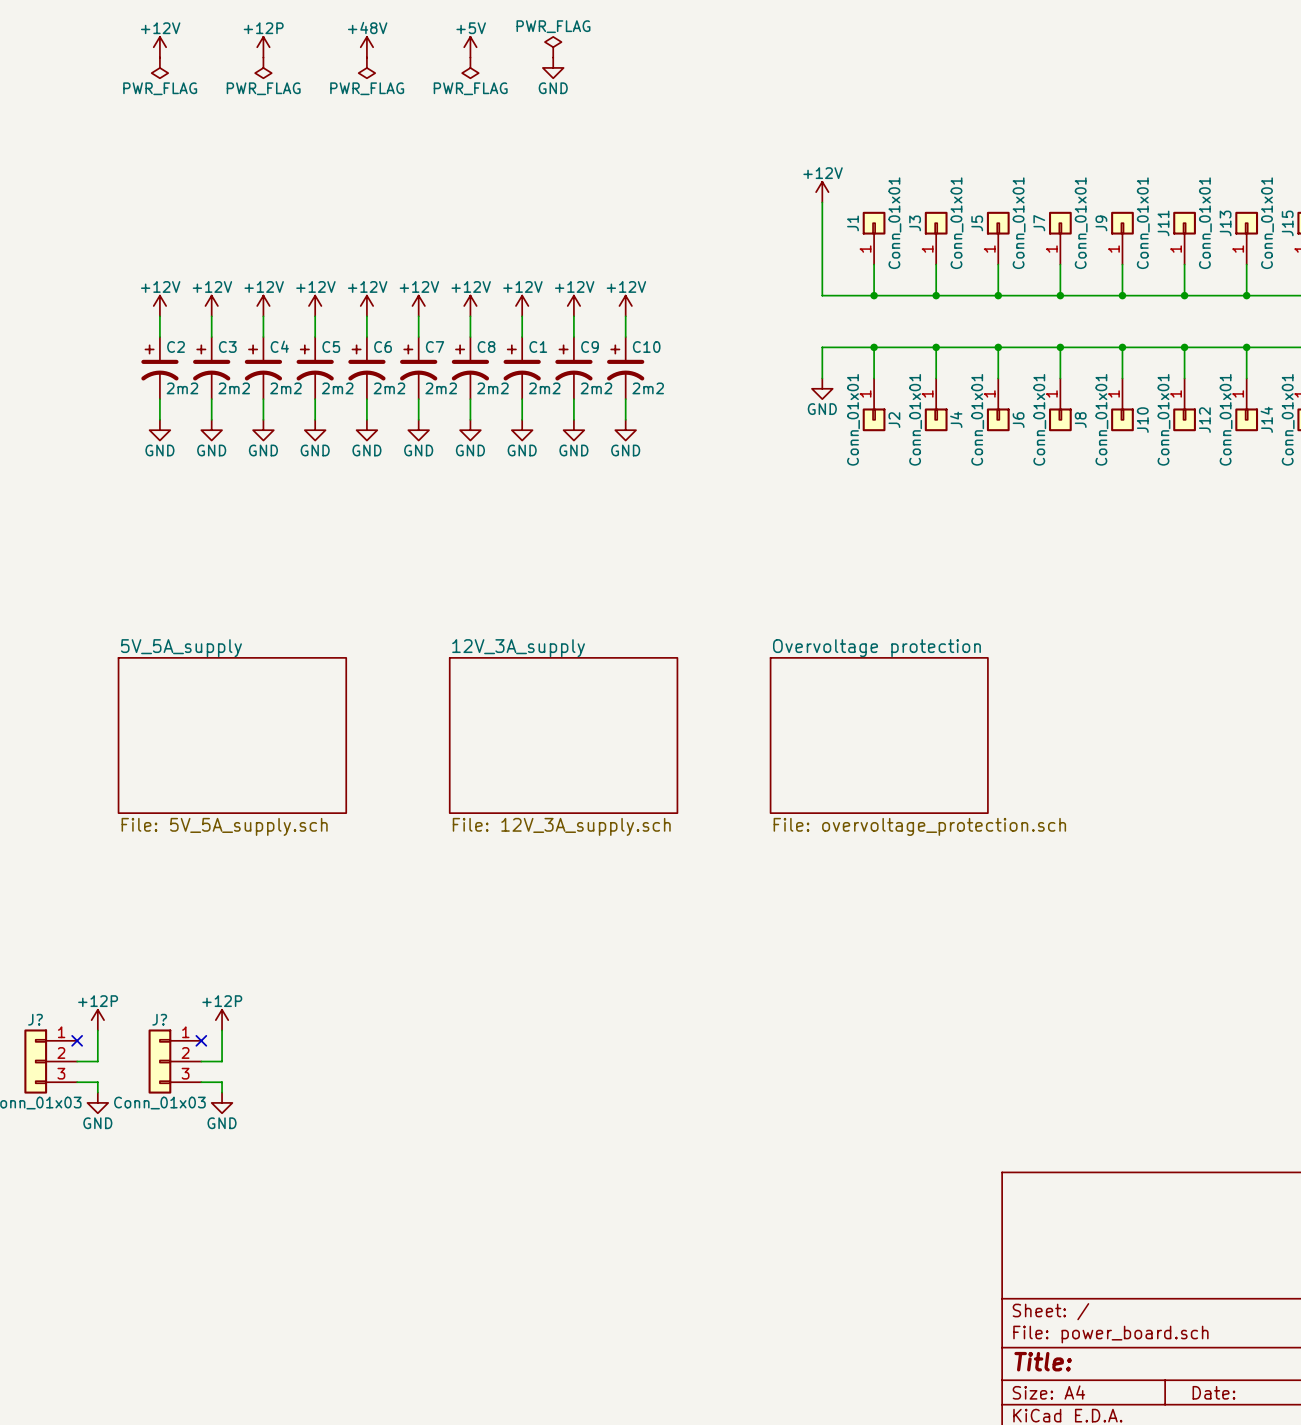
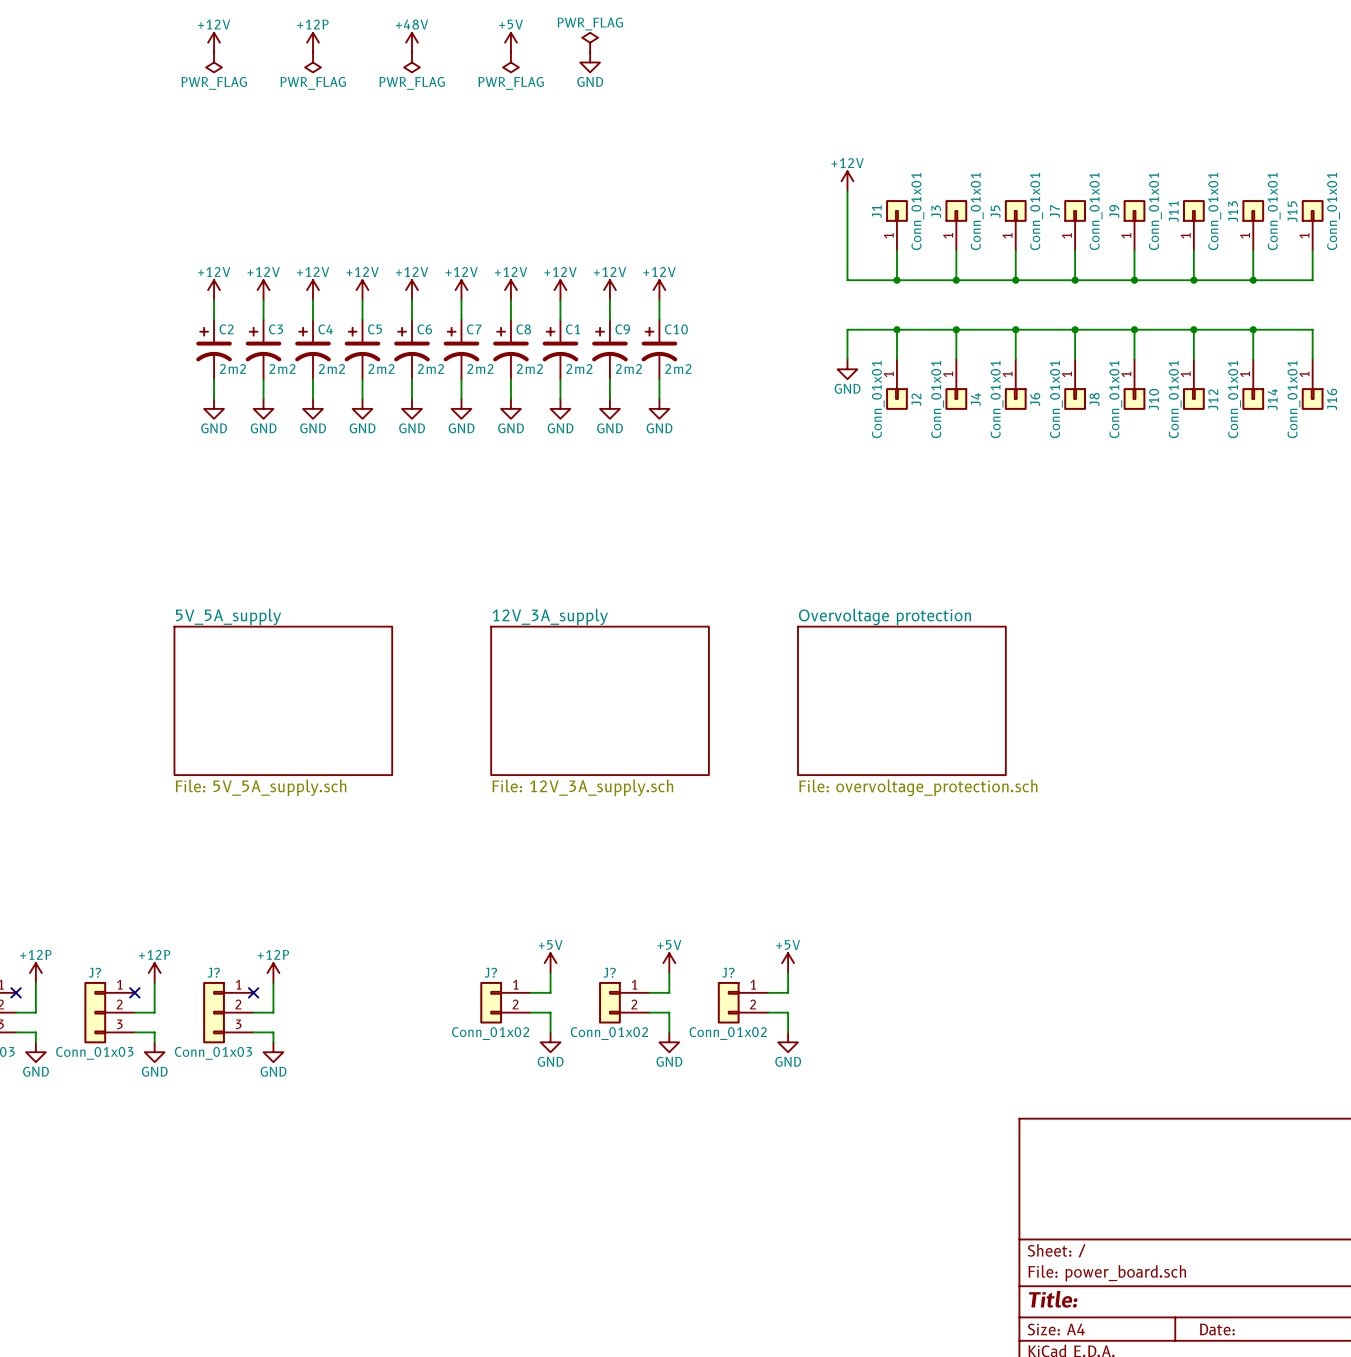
power symbol: none -> +5V (550, 963)
power symbol: none -> +5V (669, 963)
power symbol: none -> +5V (788, 963)
wire: none -> (550, 973) (550, 992) (530, 992)
wire: none -> (669, 973) (669, 992) (649, 992)
wire: none -> (788, 973) (788, 992) (768, 992)
J?: none -> Conn_01x02 (505, 1002)
J?: none -> Conn_01x02 (624, 1002)
J?: none -> Conn_01x02 (743, 1002)
wire: none -> (530, 1012) (550, 1012) (550, 1032)
wire: none -> (649, 1012) (669, 1012) (669, 1032)
wire: none -> (768, 1012) (788, 1012) (788, 1032)
power symbol: none -> GND (550, 1042)
power symbol: none -> GND (669, 1042)
power symbol: none -> GND (788, 1042)

